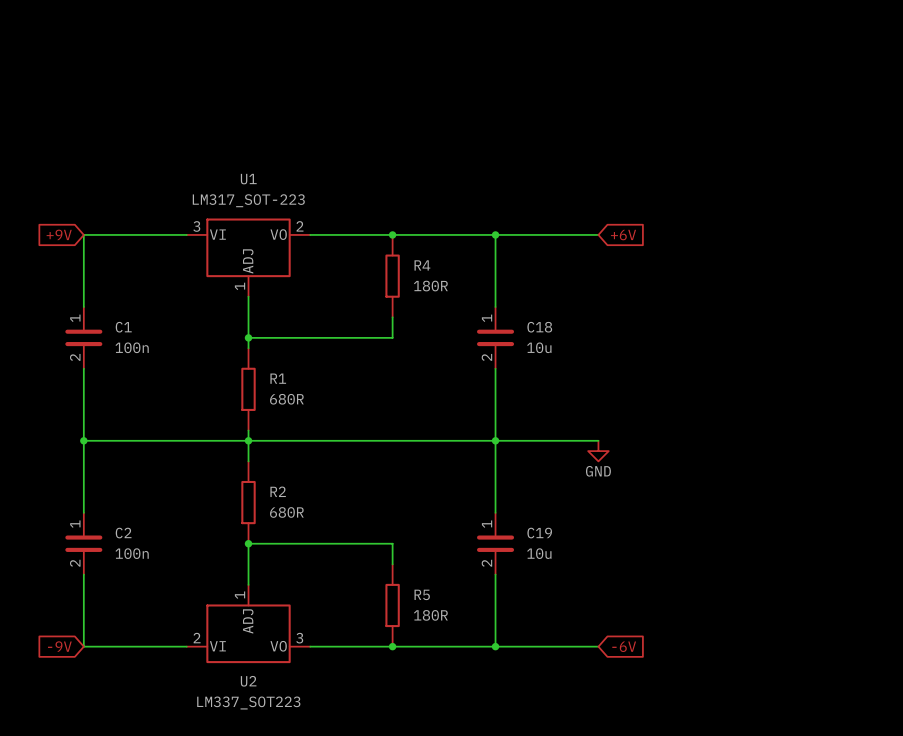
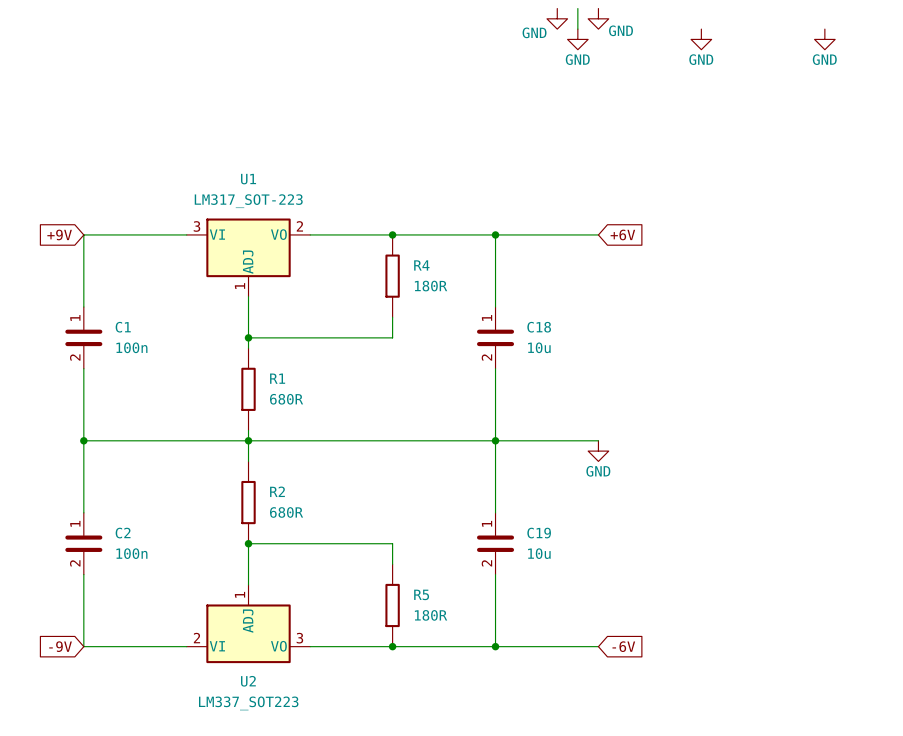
wire: none -> (577, 8) (577, 29)
power symbol: none -> GND (557, 18)
power symbol: none -> GND (598, 18)
power symbol: none -> GND (577, 39)
power symbol: none -> GND (701, 39)
power symbol: none -> GND (824, 39)

